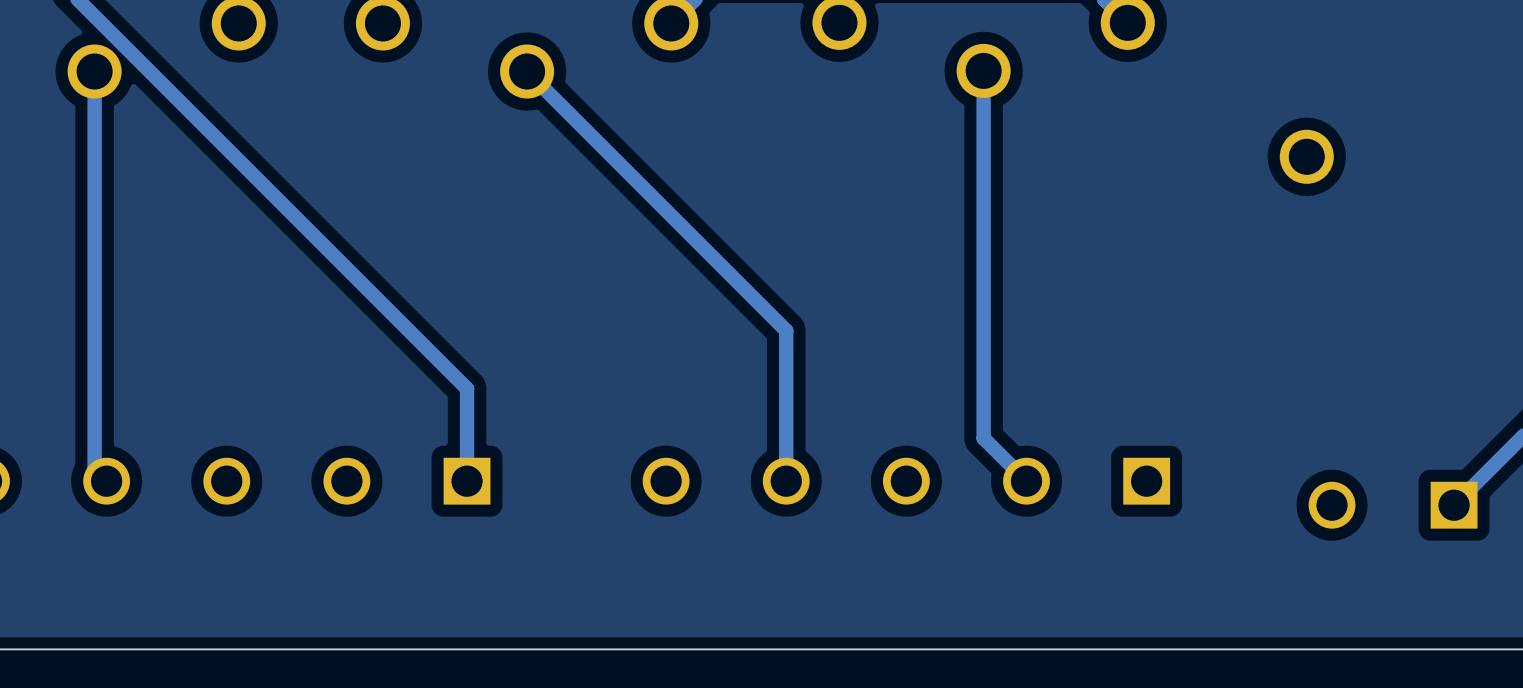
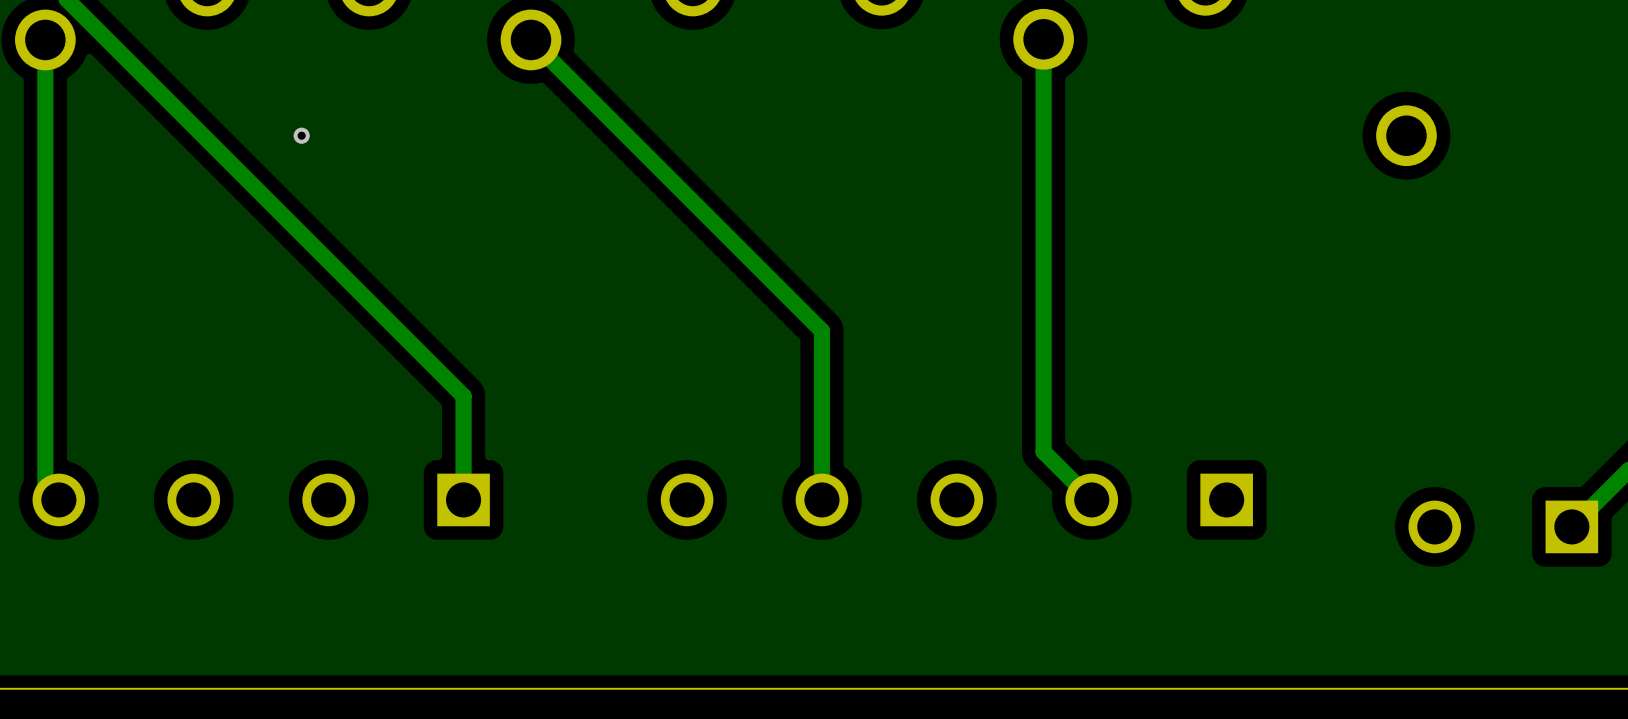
via: none -> (301, 135)

